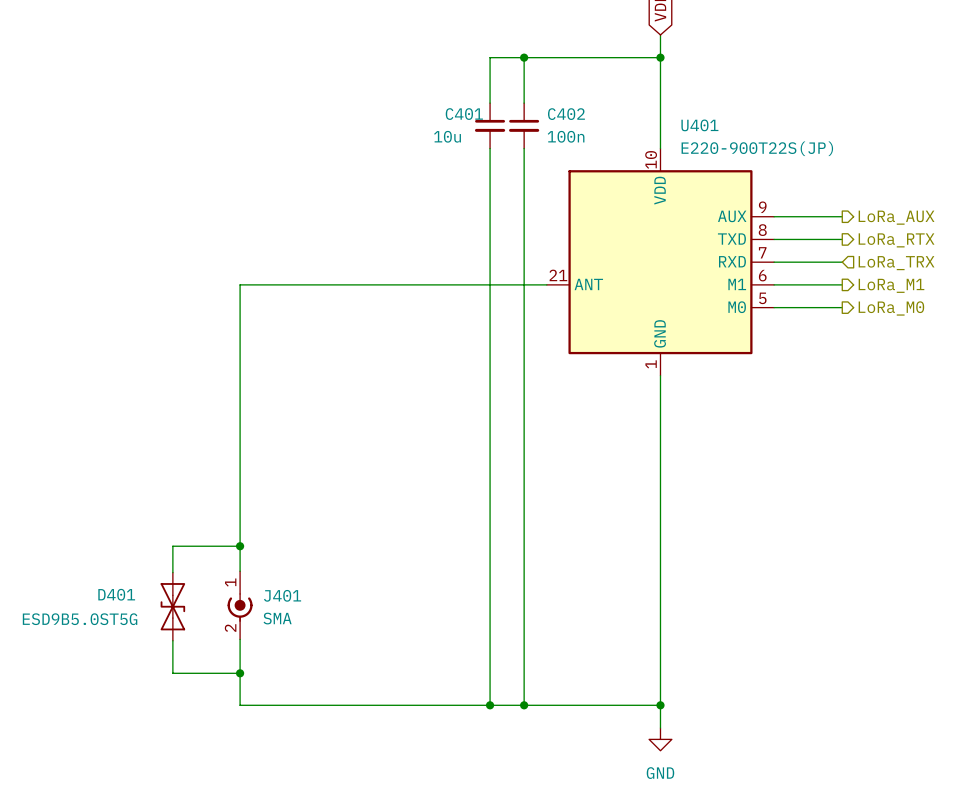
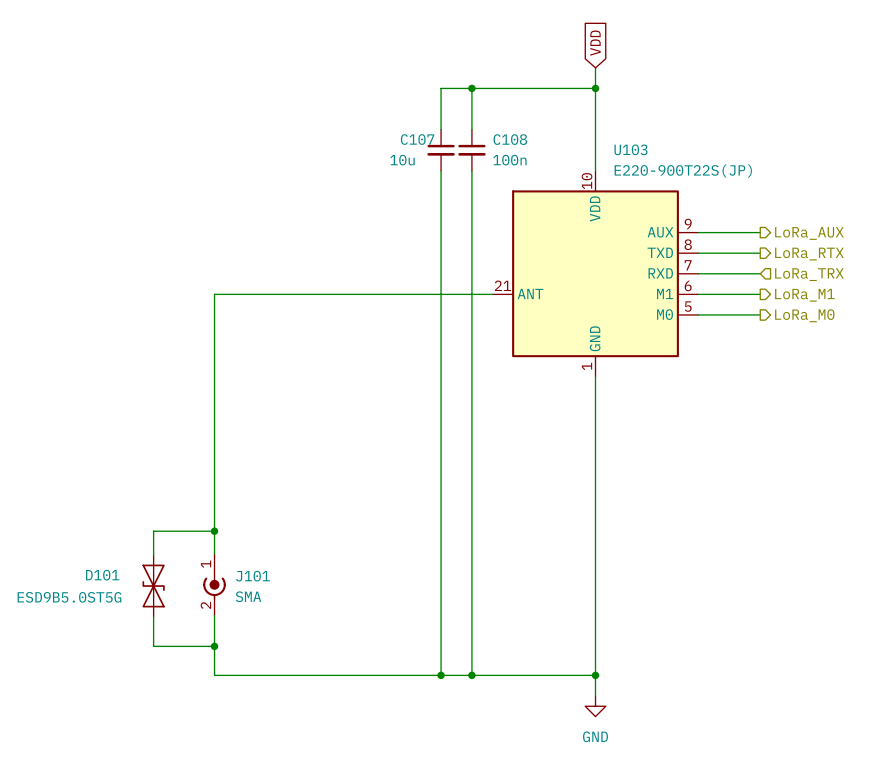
C401 name: C401 (464, 114) -> C107 (417, 139)
C402 name: C402 (566, 114) -> C108 (510, 139)
U401 name: U401 (699, 125) -> U103 (630, 149)
D401 name: D401 (116, 594) -> D101 (102, 575)
J401 name: J401 (282, 595) -> J101 (253, 576)

